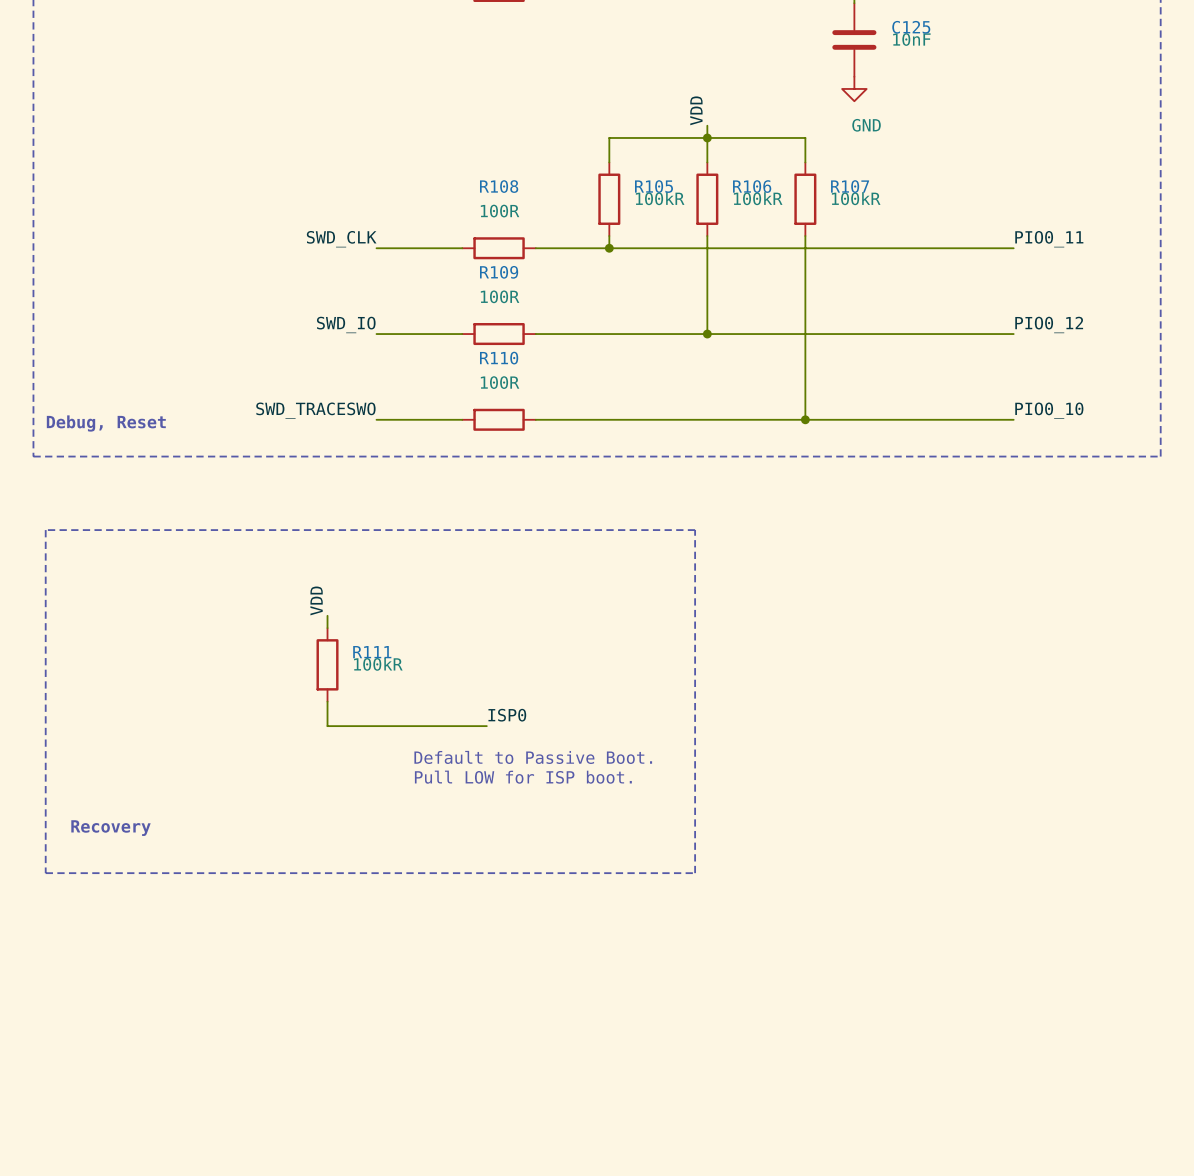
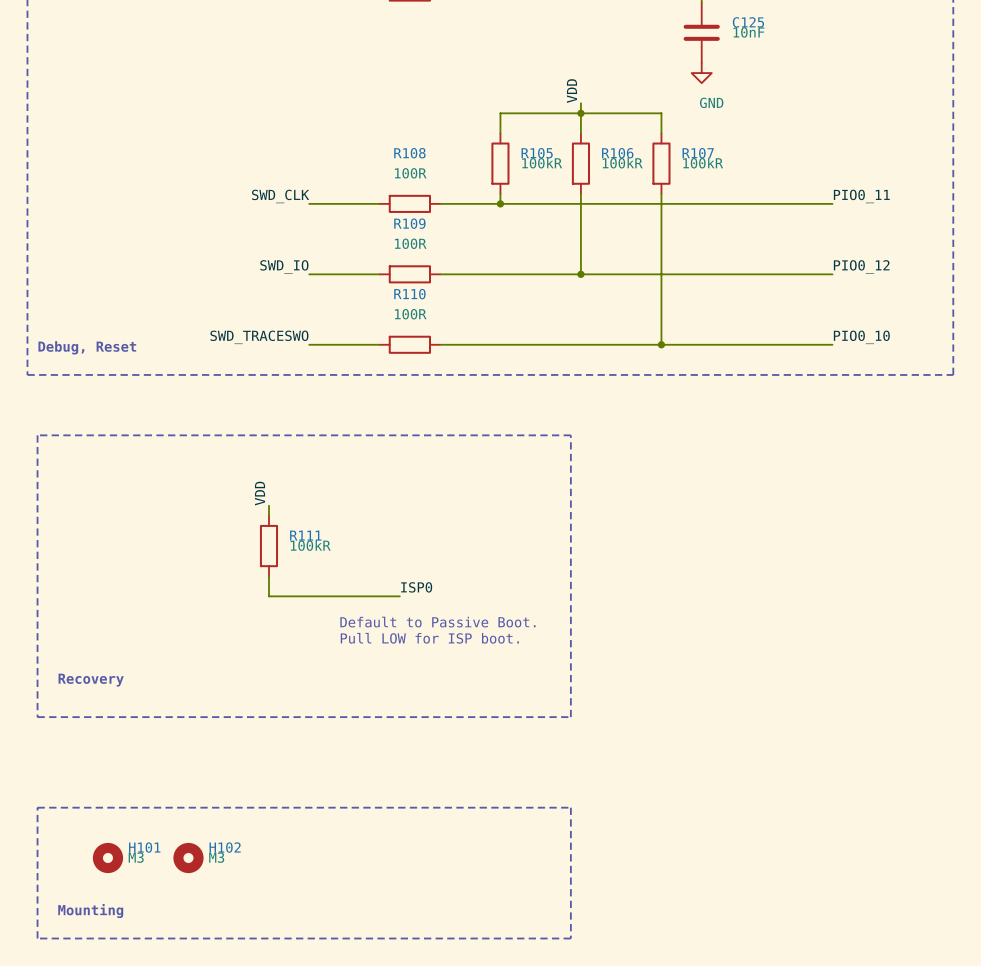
line: none -> (37, 807) (570, 807) (570, 938) (37, 938) (37, 807)
H101: none -> M3 (107, 858)
H102: none -> M3 (188, 858)
text: none -> Mounting (90, 910)

